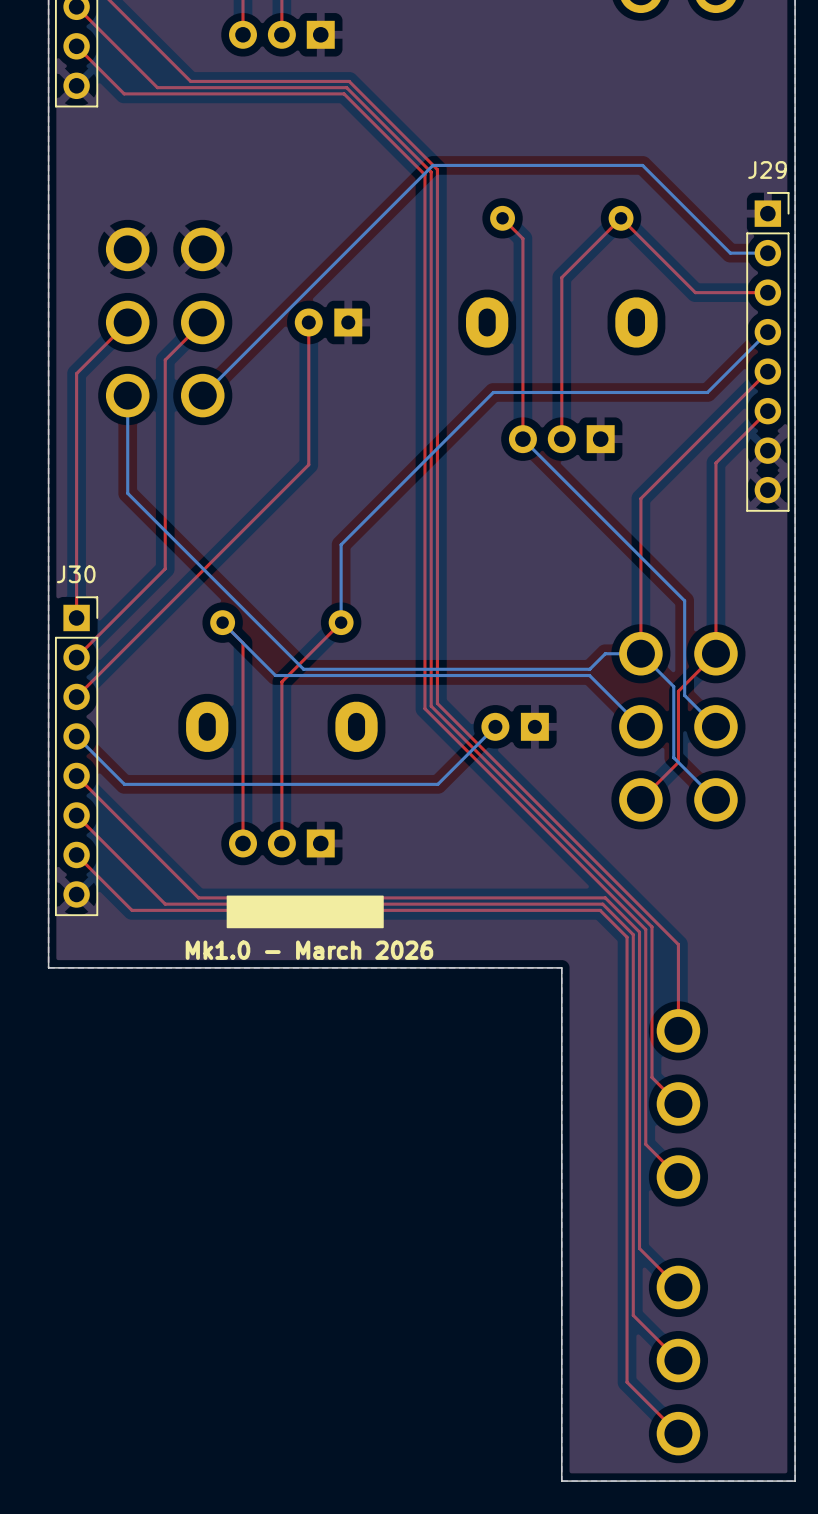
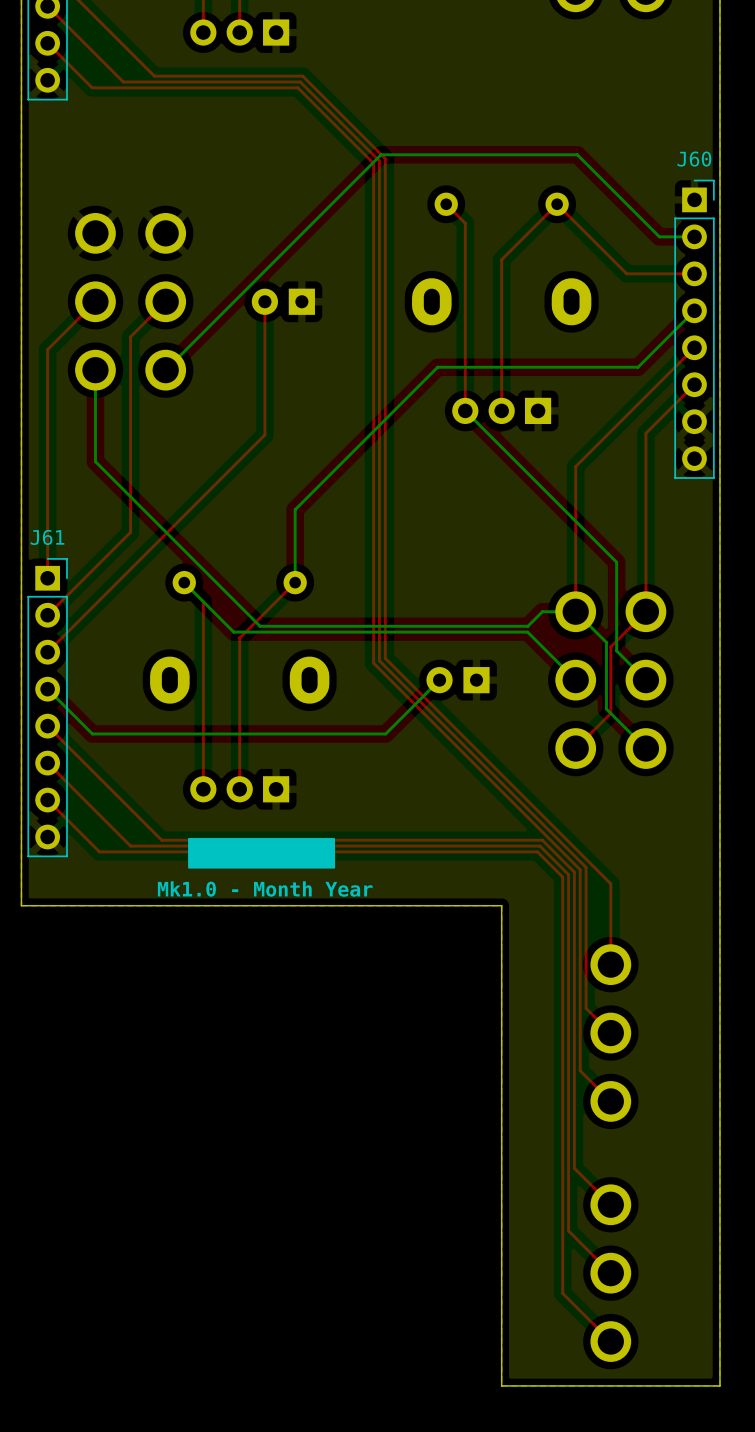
J29 name: J29 (767, 169) -> J60 (694, 159)
J30 name: J30 (76, 574) -> J61 (47, 537)
text: Mk1.0 - March 2026 (309, 950) -> Mk1.0 - Month Year (265, 888)

